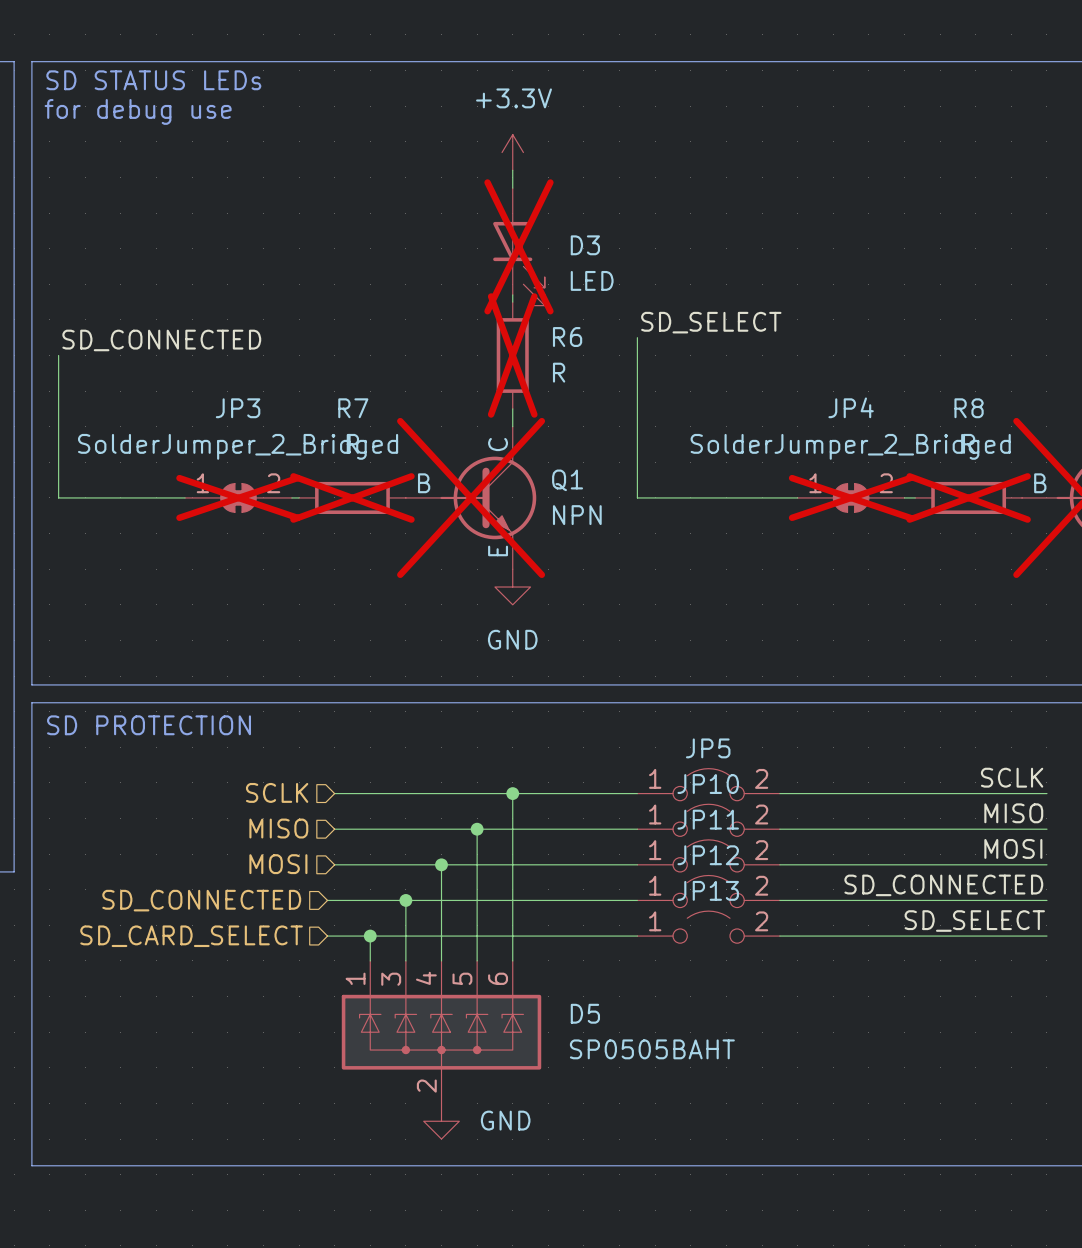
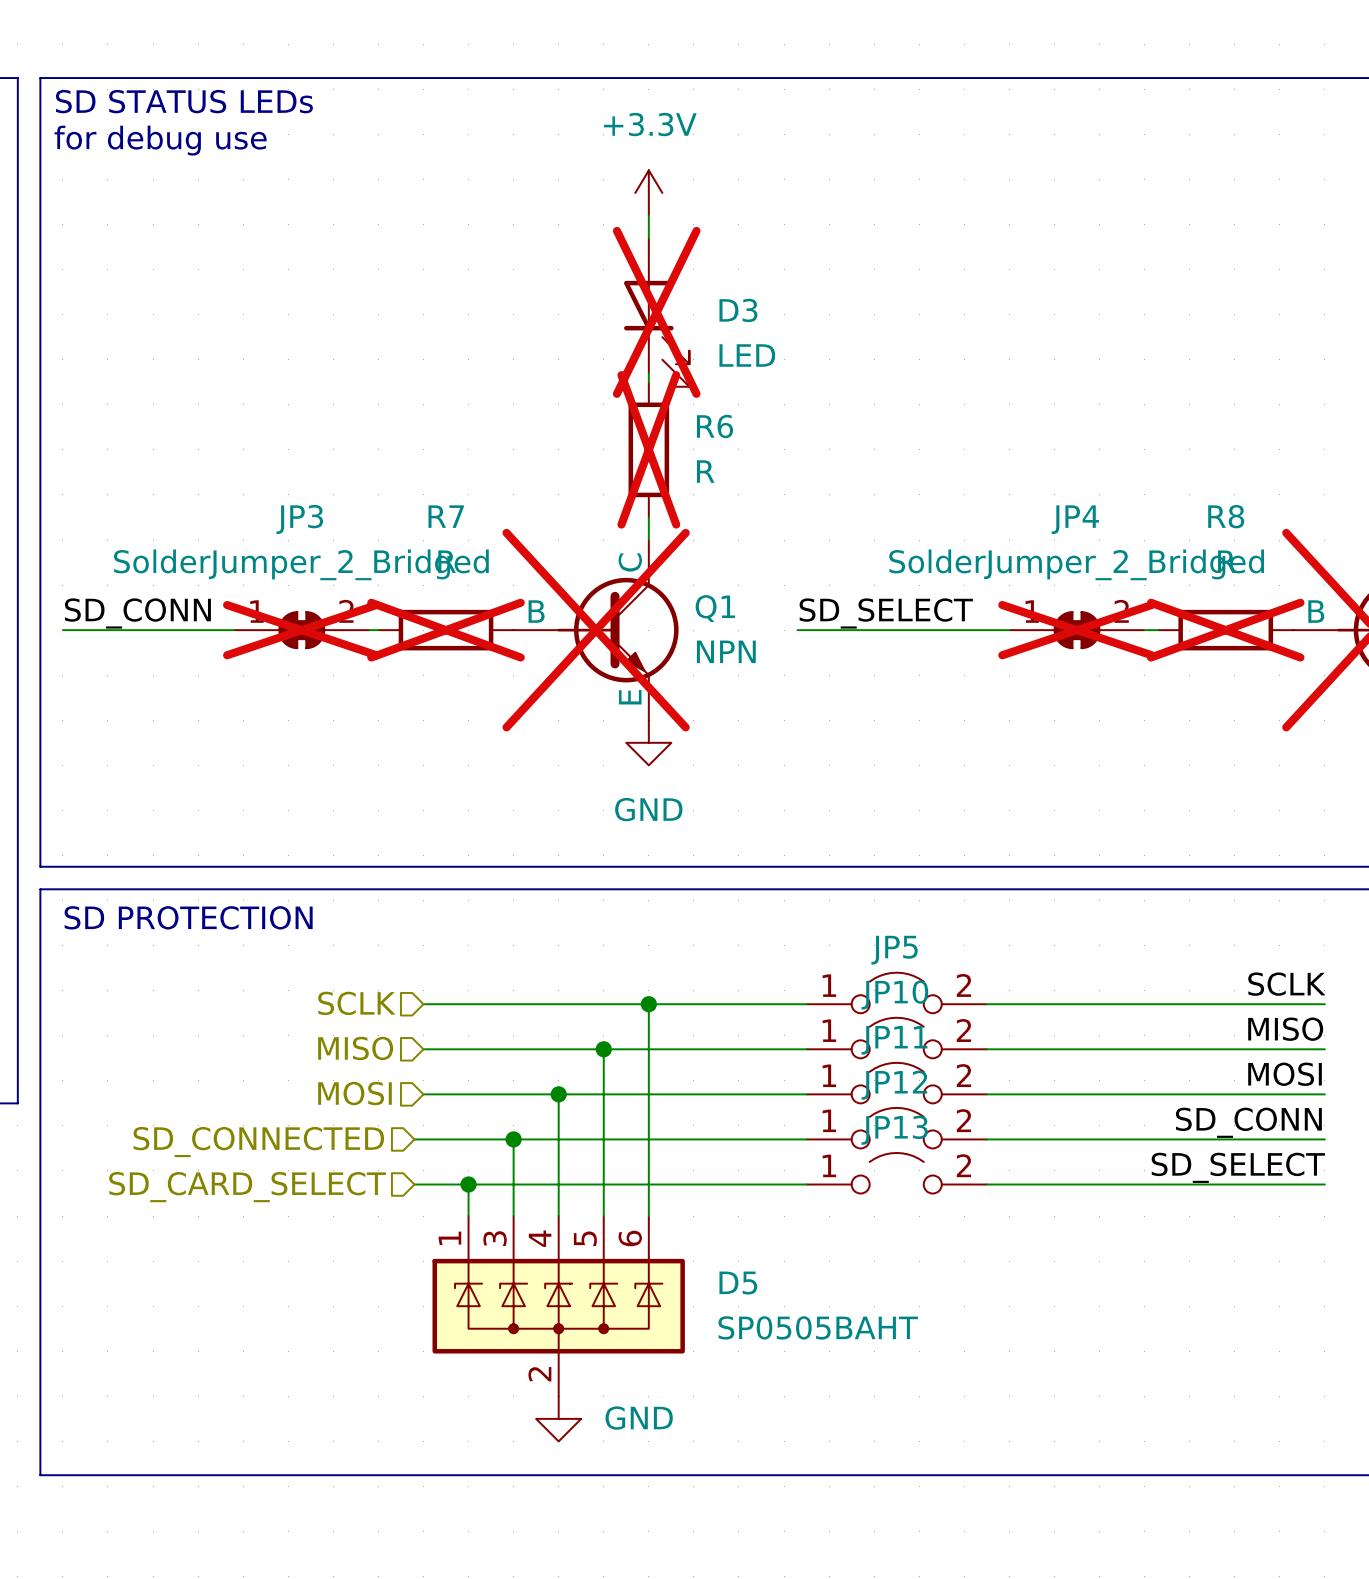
label position: SD_SELECT (711, 322) -> SD_SELECT (886, 613)
wire: (637, 337) (637, 497) -> (797, 630) (806, 630)
label: SD_CONNECTED (161, 340) -> none
wire: (58, 355) (58, 497) -> (62, 630) (74, 630)
label: none -> SD_CONN (137, 613)
label: SD_CONNECTED (943, 885) -> SD_CONN (1248, 1122)

